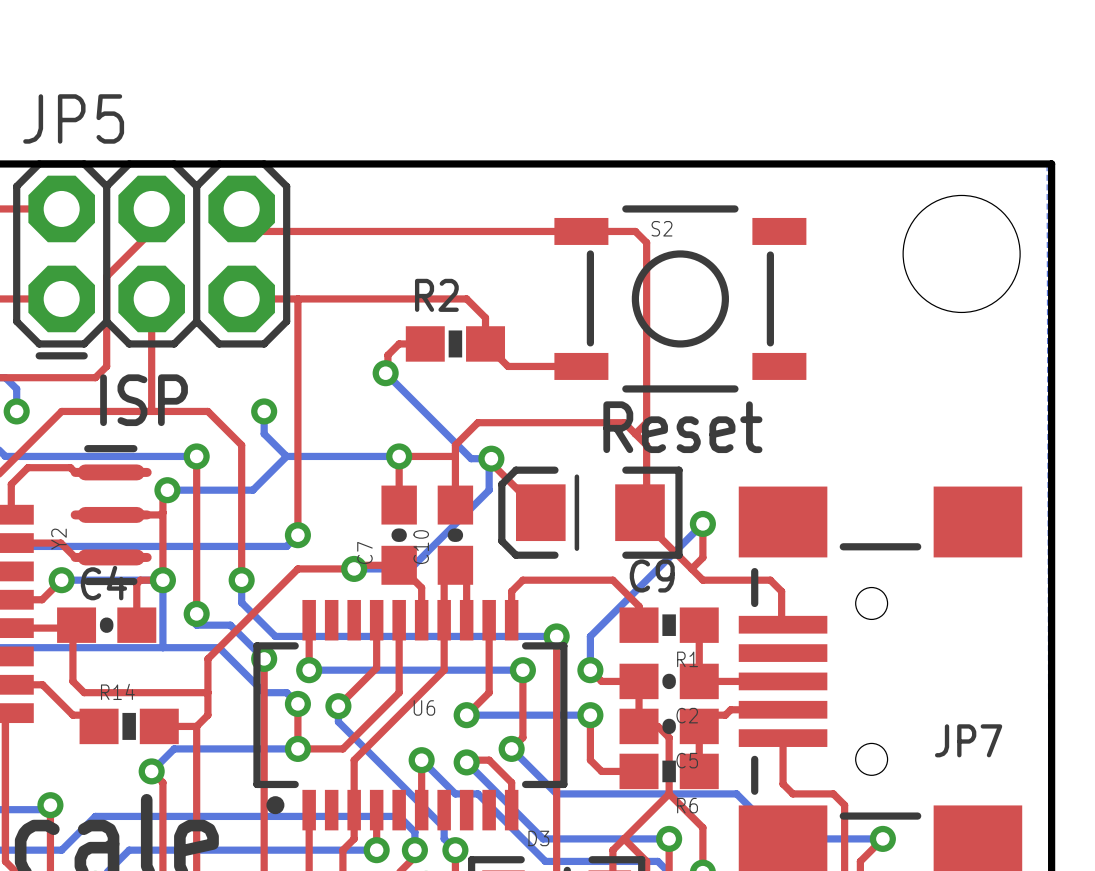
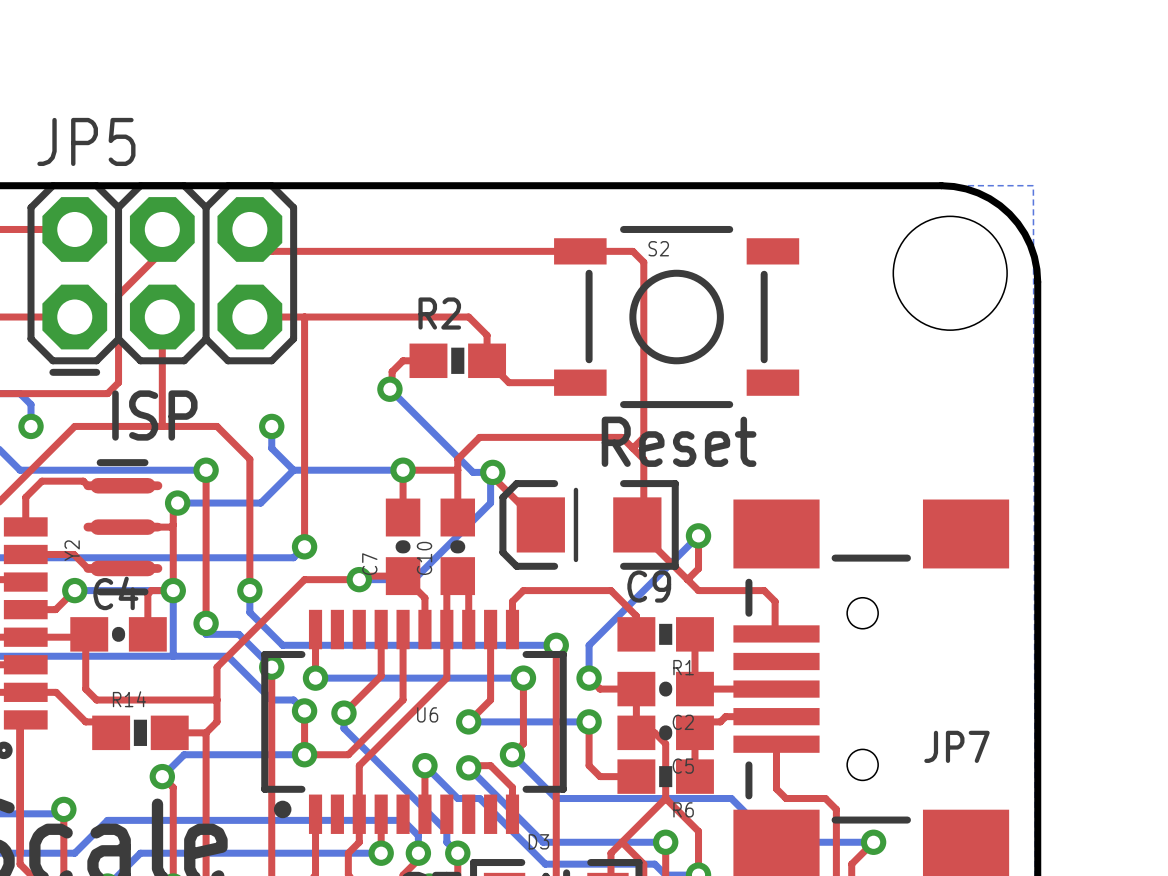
board edge: (952, 163) (1051, 163) (1051, 262) -> (941, 185) (954, 186) (978, 193) (989, 198) (1009, 213) (1024, 233) (1030, 245) (1036, 269) (1037, 282)

